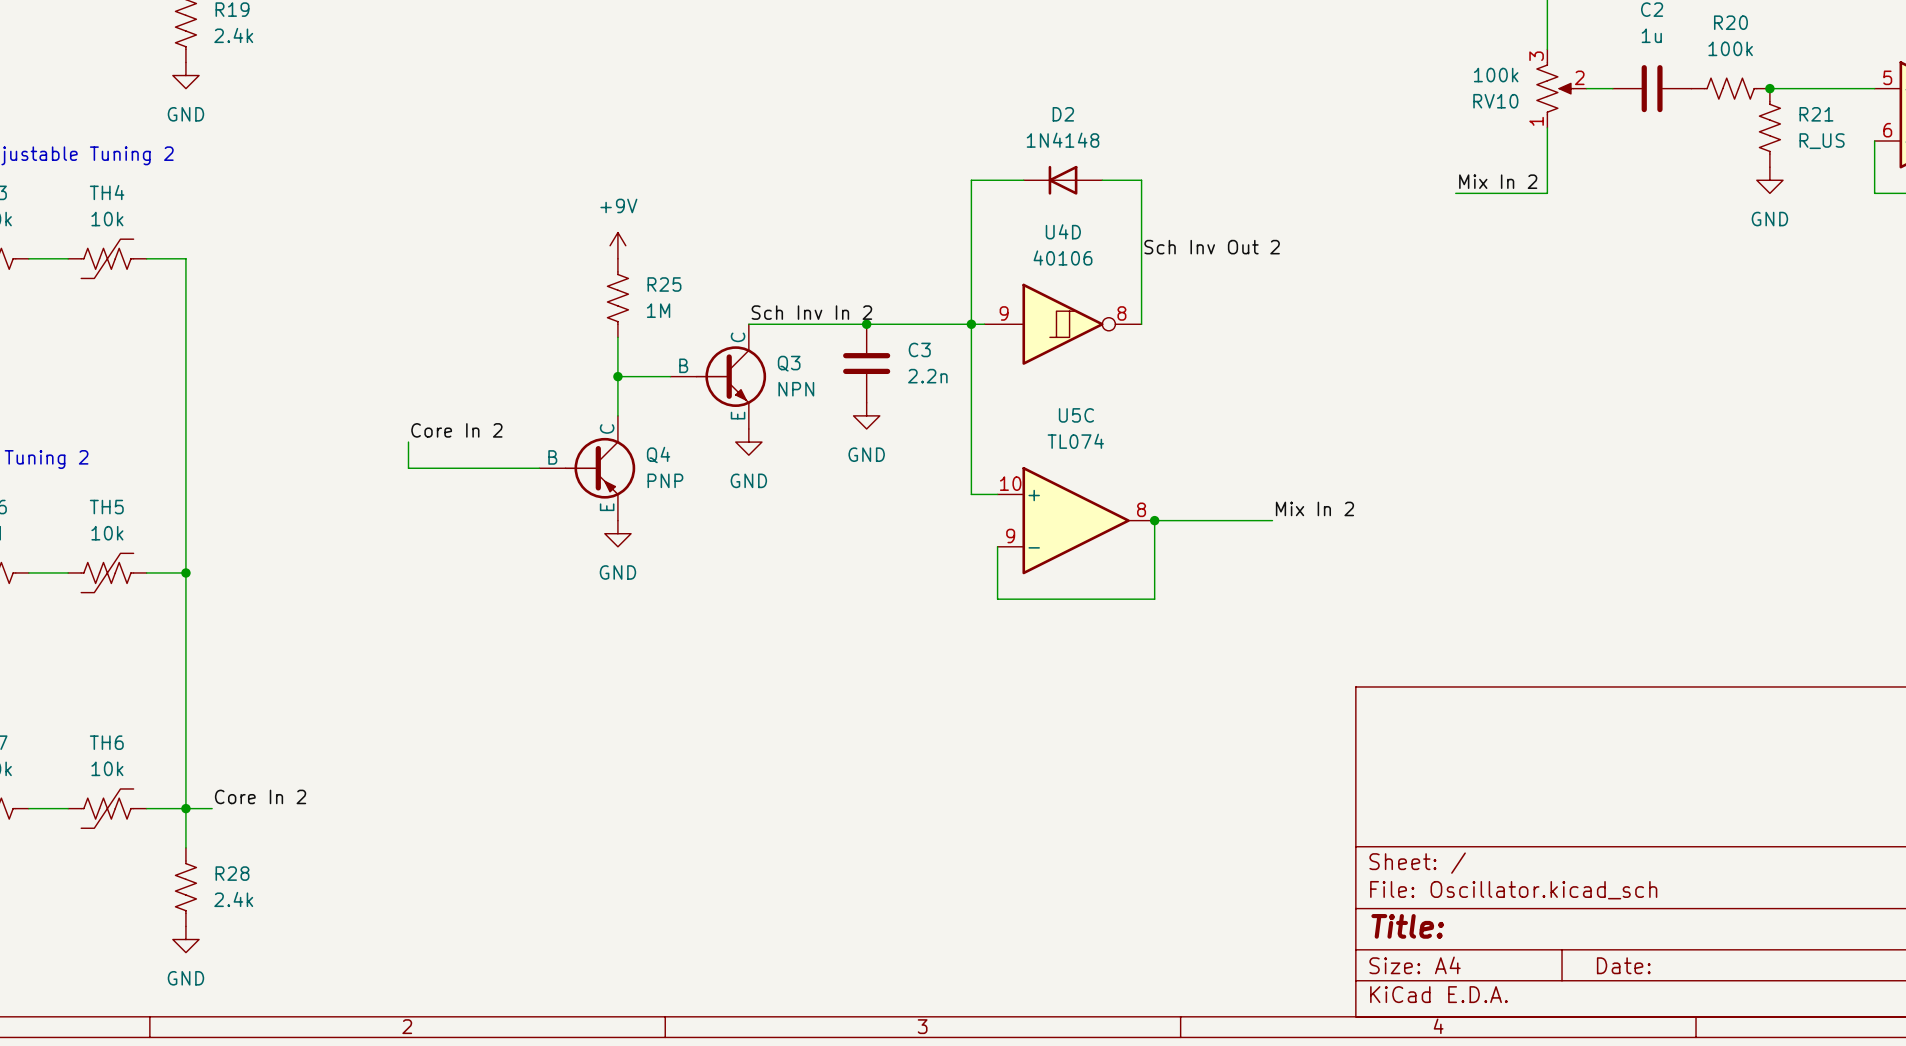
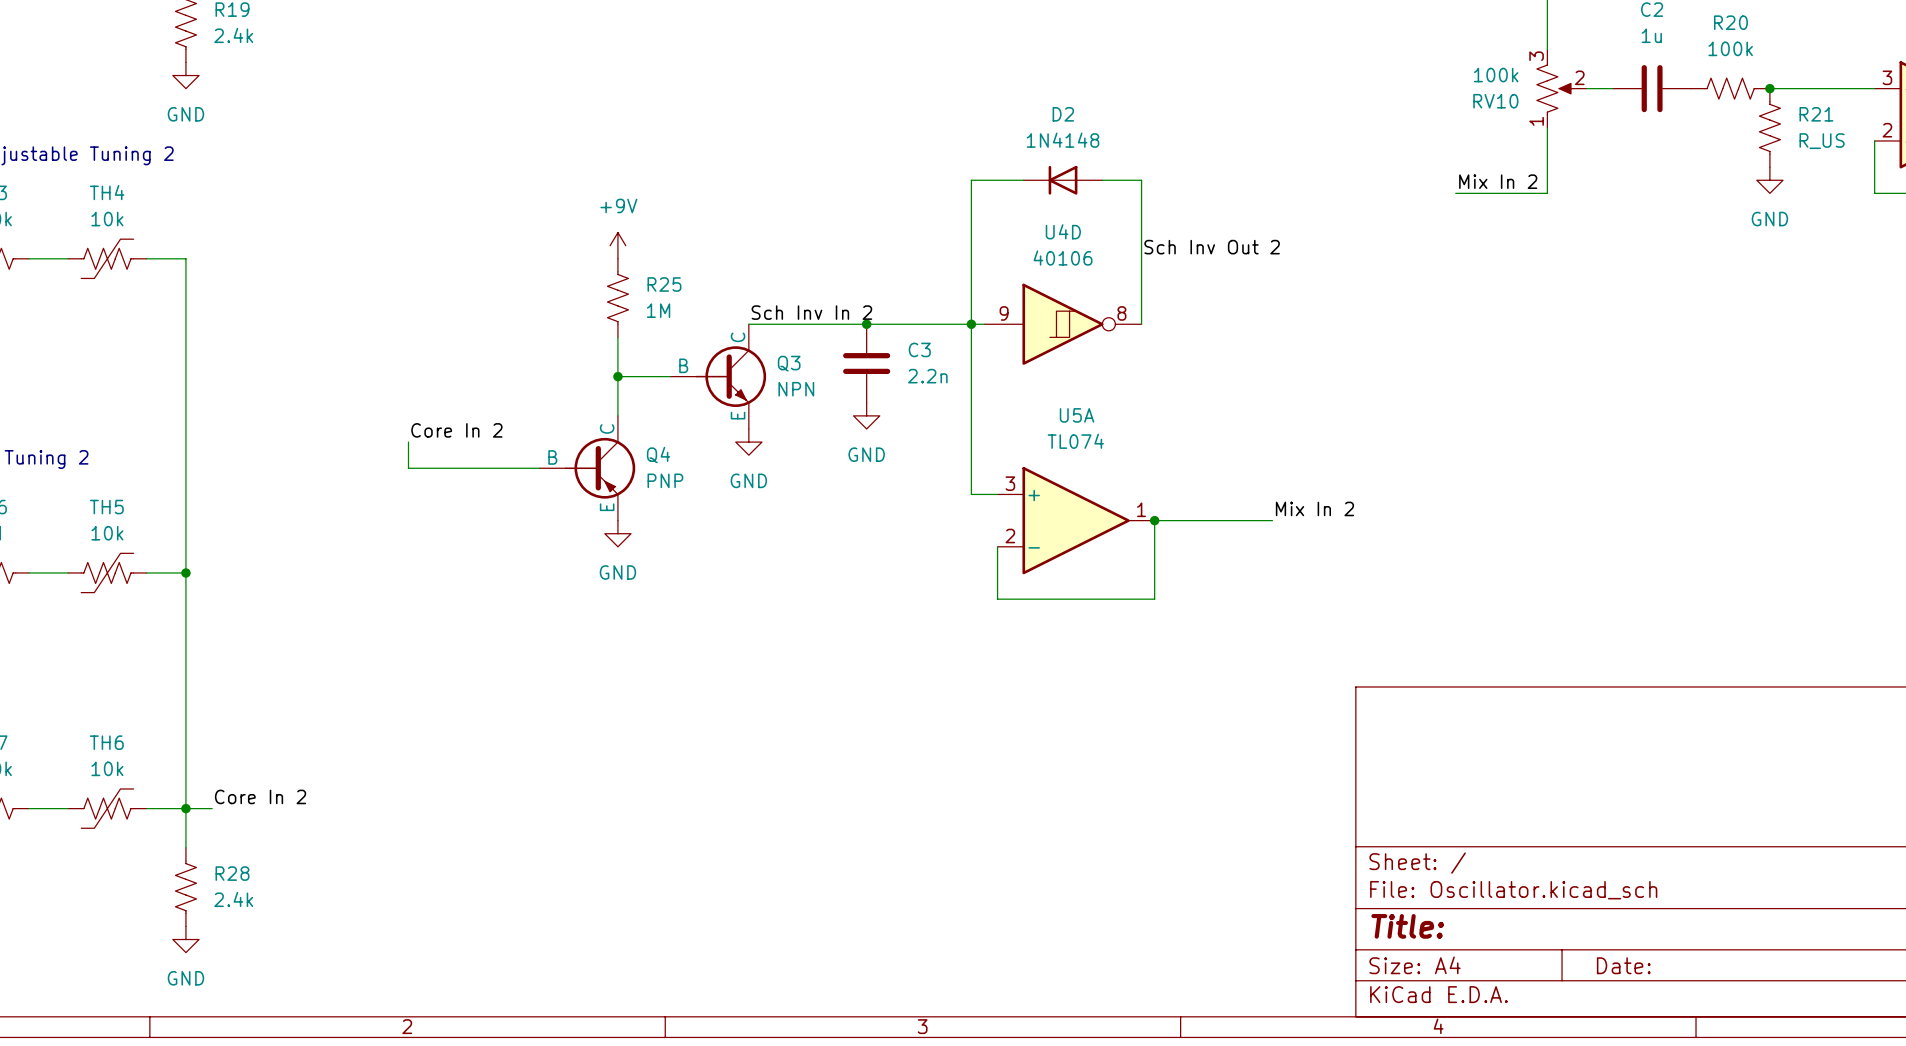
part pin number: 5 (1887, 77) -> 3 (1887, 77)
part pin number: 6 (1887, 130) -> 2 (1887, 130)
U5C name: U5C (1076, 415) -> U5A (1077, 415)
U5C pin number: 10 (1010, 483) -> 3 (1010, 483)
U5C pin number: 8 (1141, 509) -> 1 (1141, 509)
U5C pin number: 9 (1010, 536) -> 2 (1010, 536)

